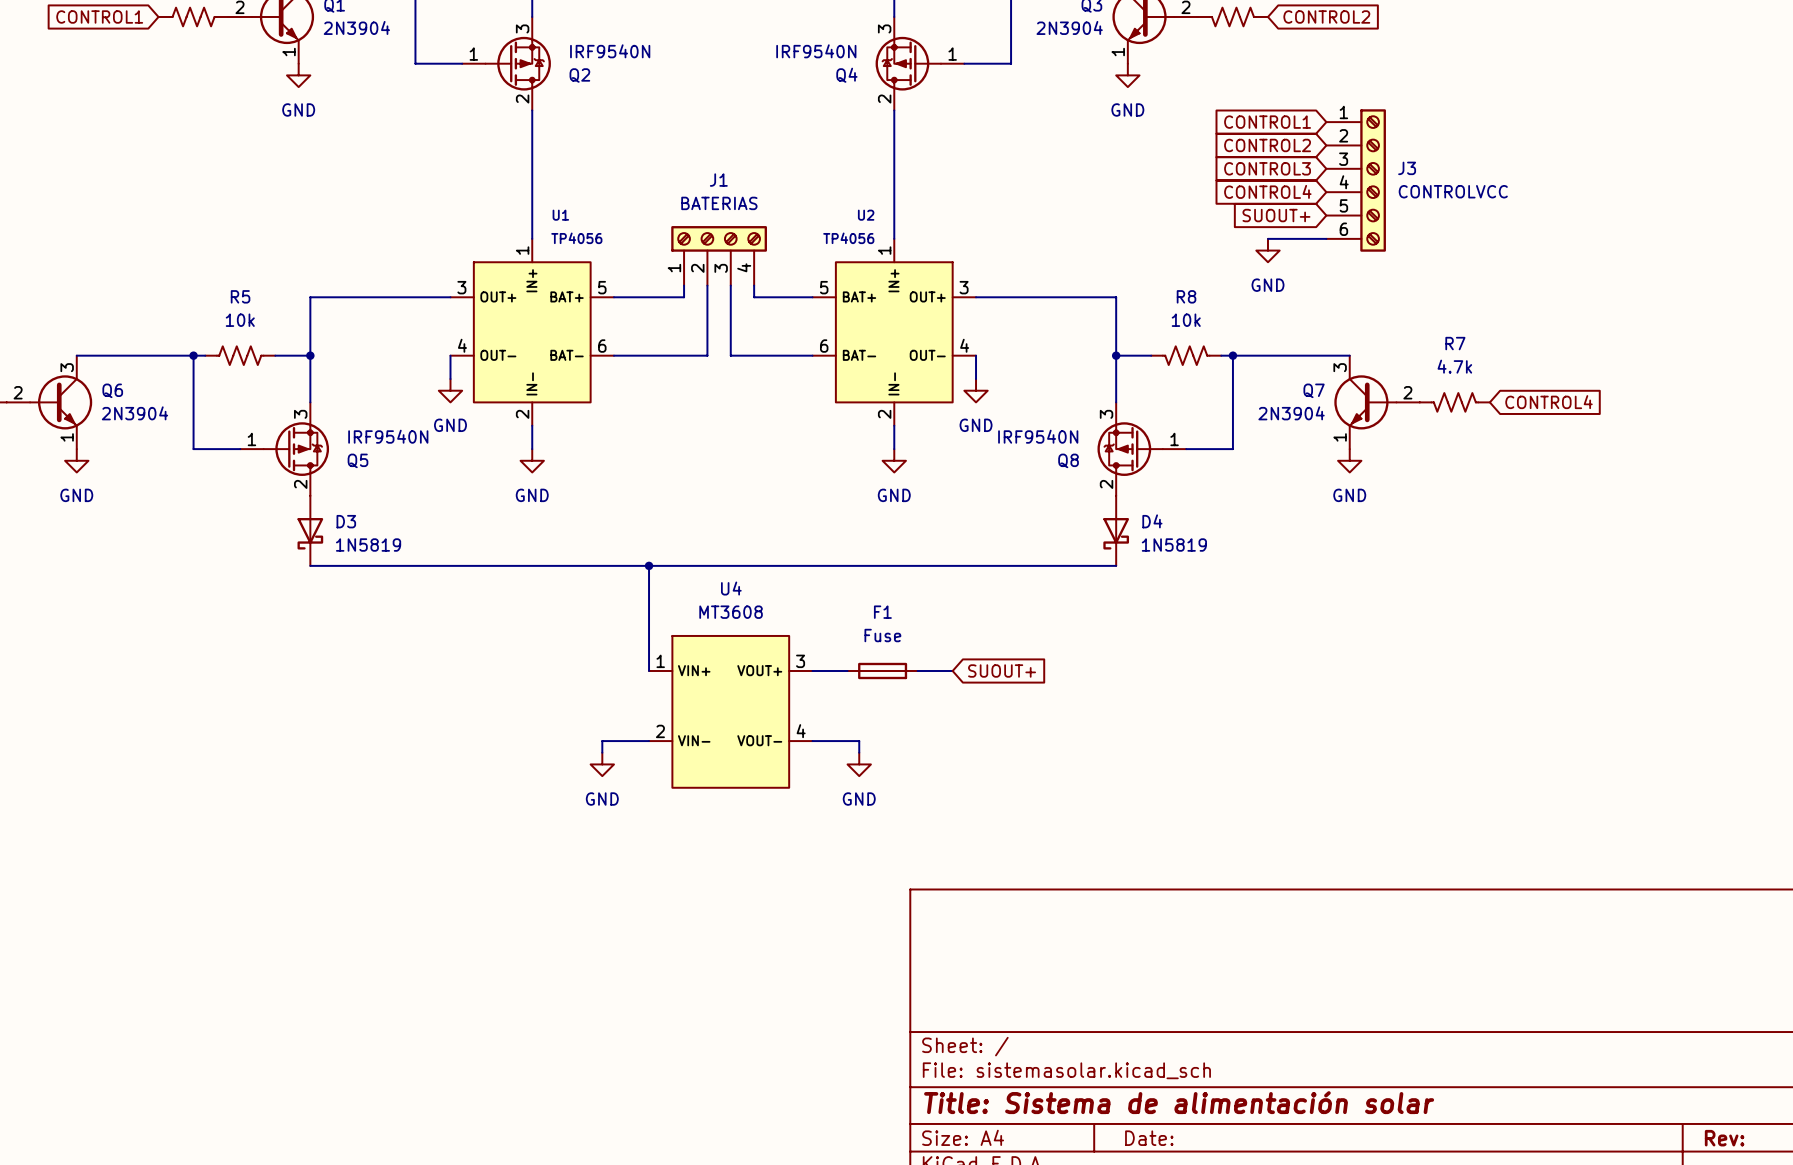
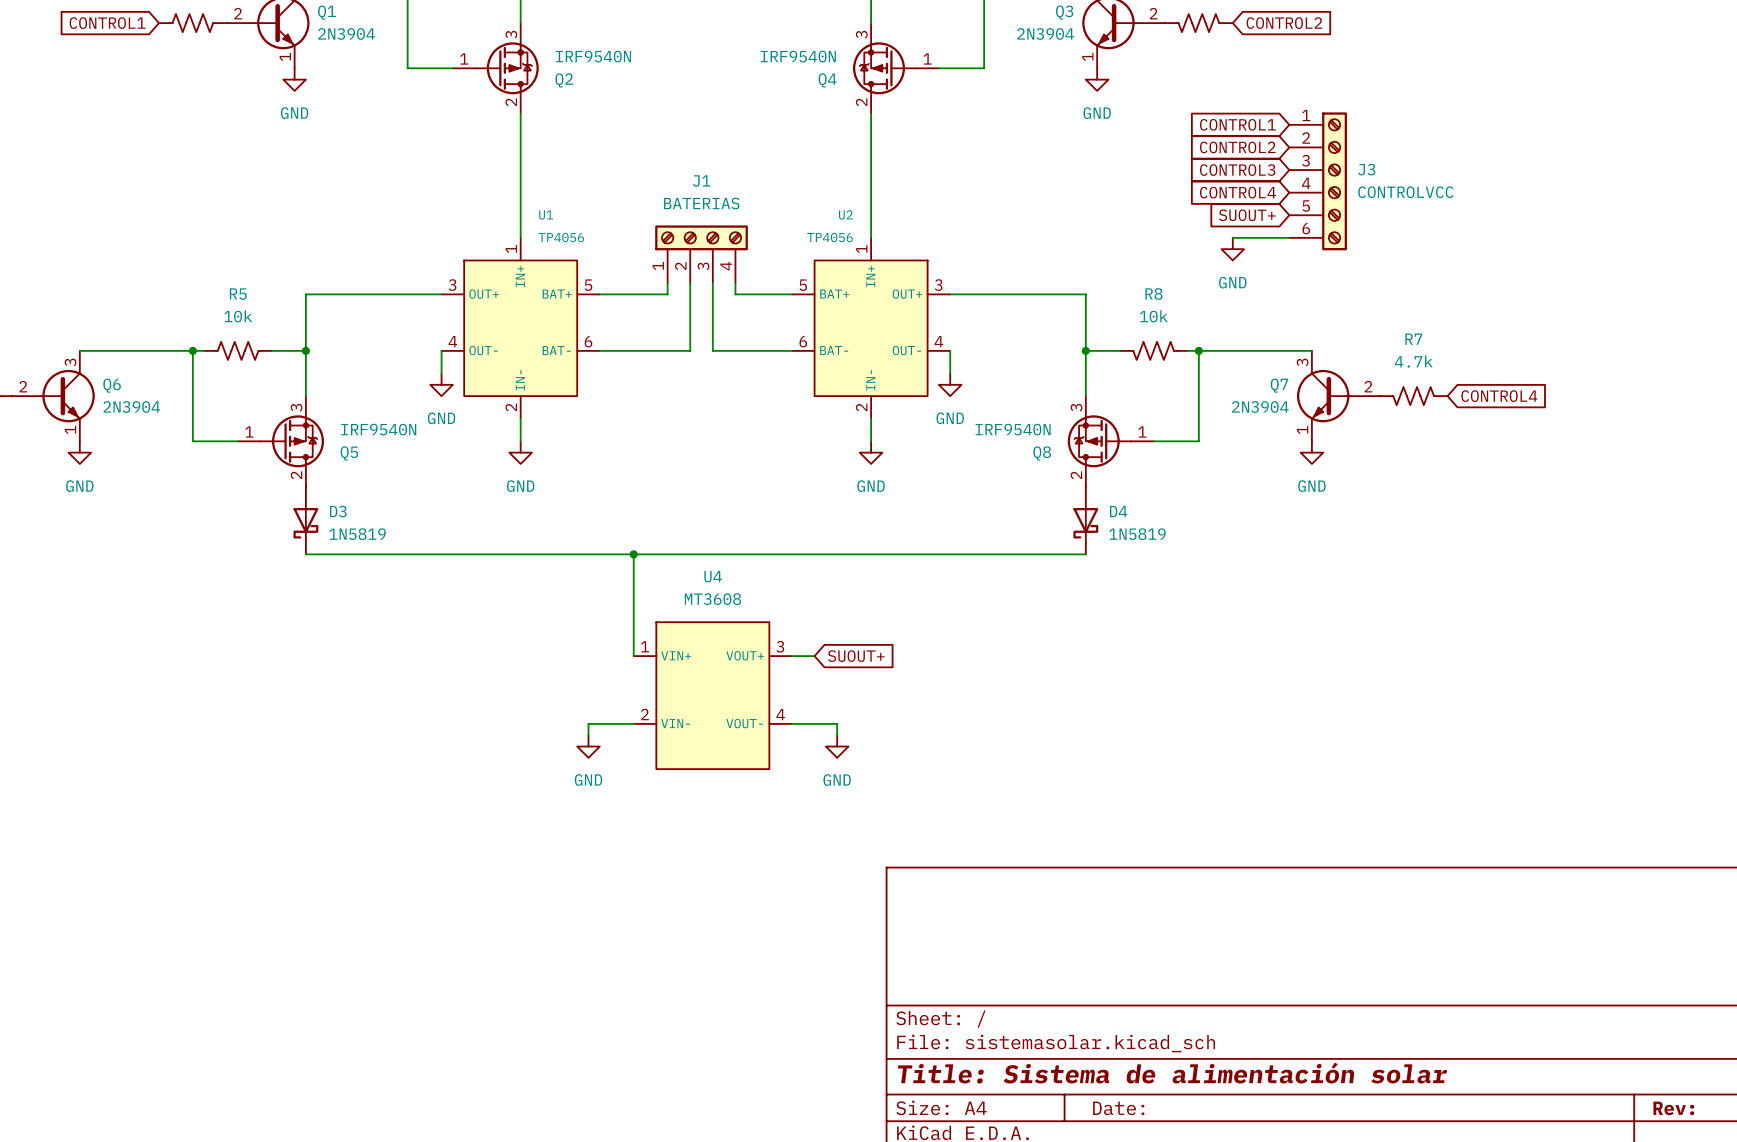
wire: (835, 670) (847, 670) -> none
F1: Fuse (882, 670) -> none
wire: (917, 670) (952, 670) -> none
global label position: SUOUT+ (1002, 670) -> SUOUT+ (856, 656)

